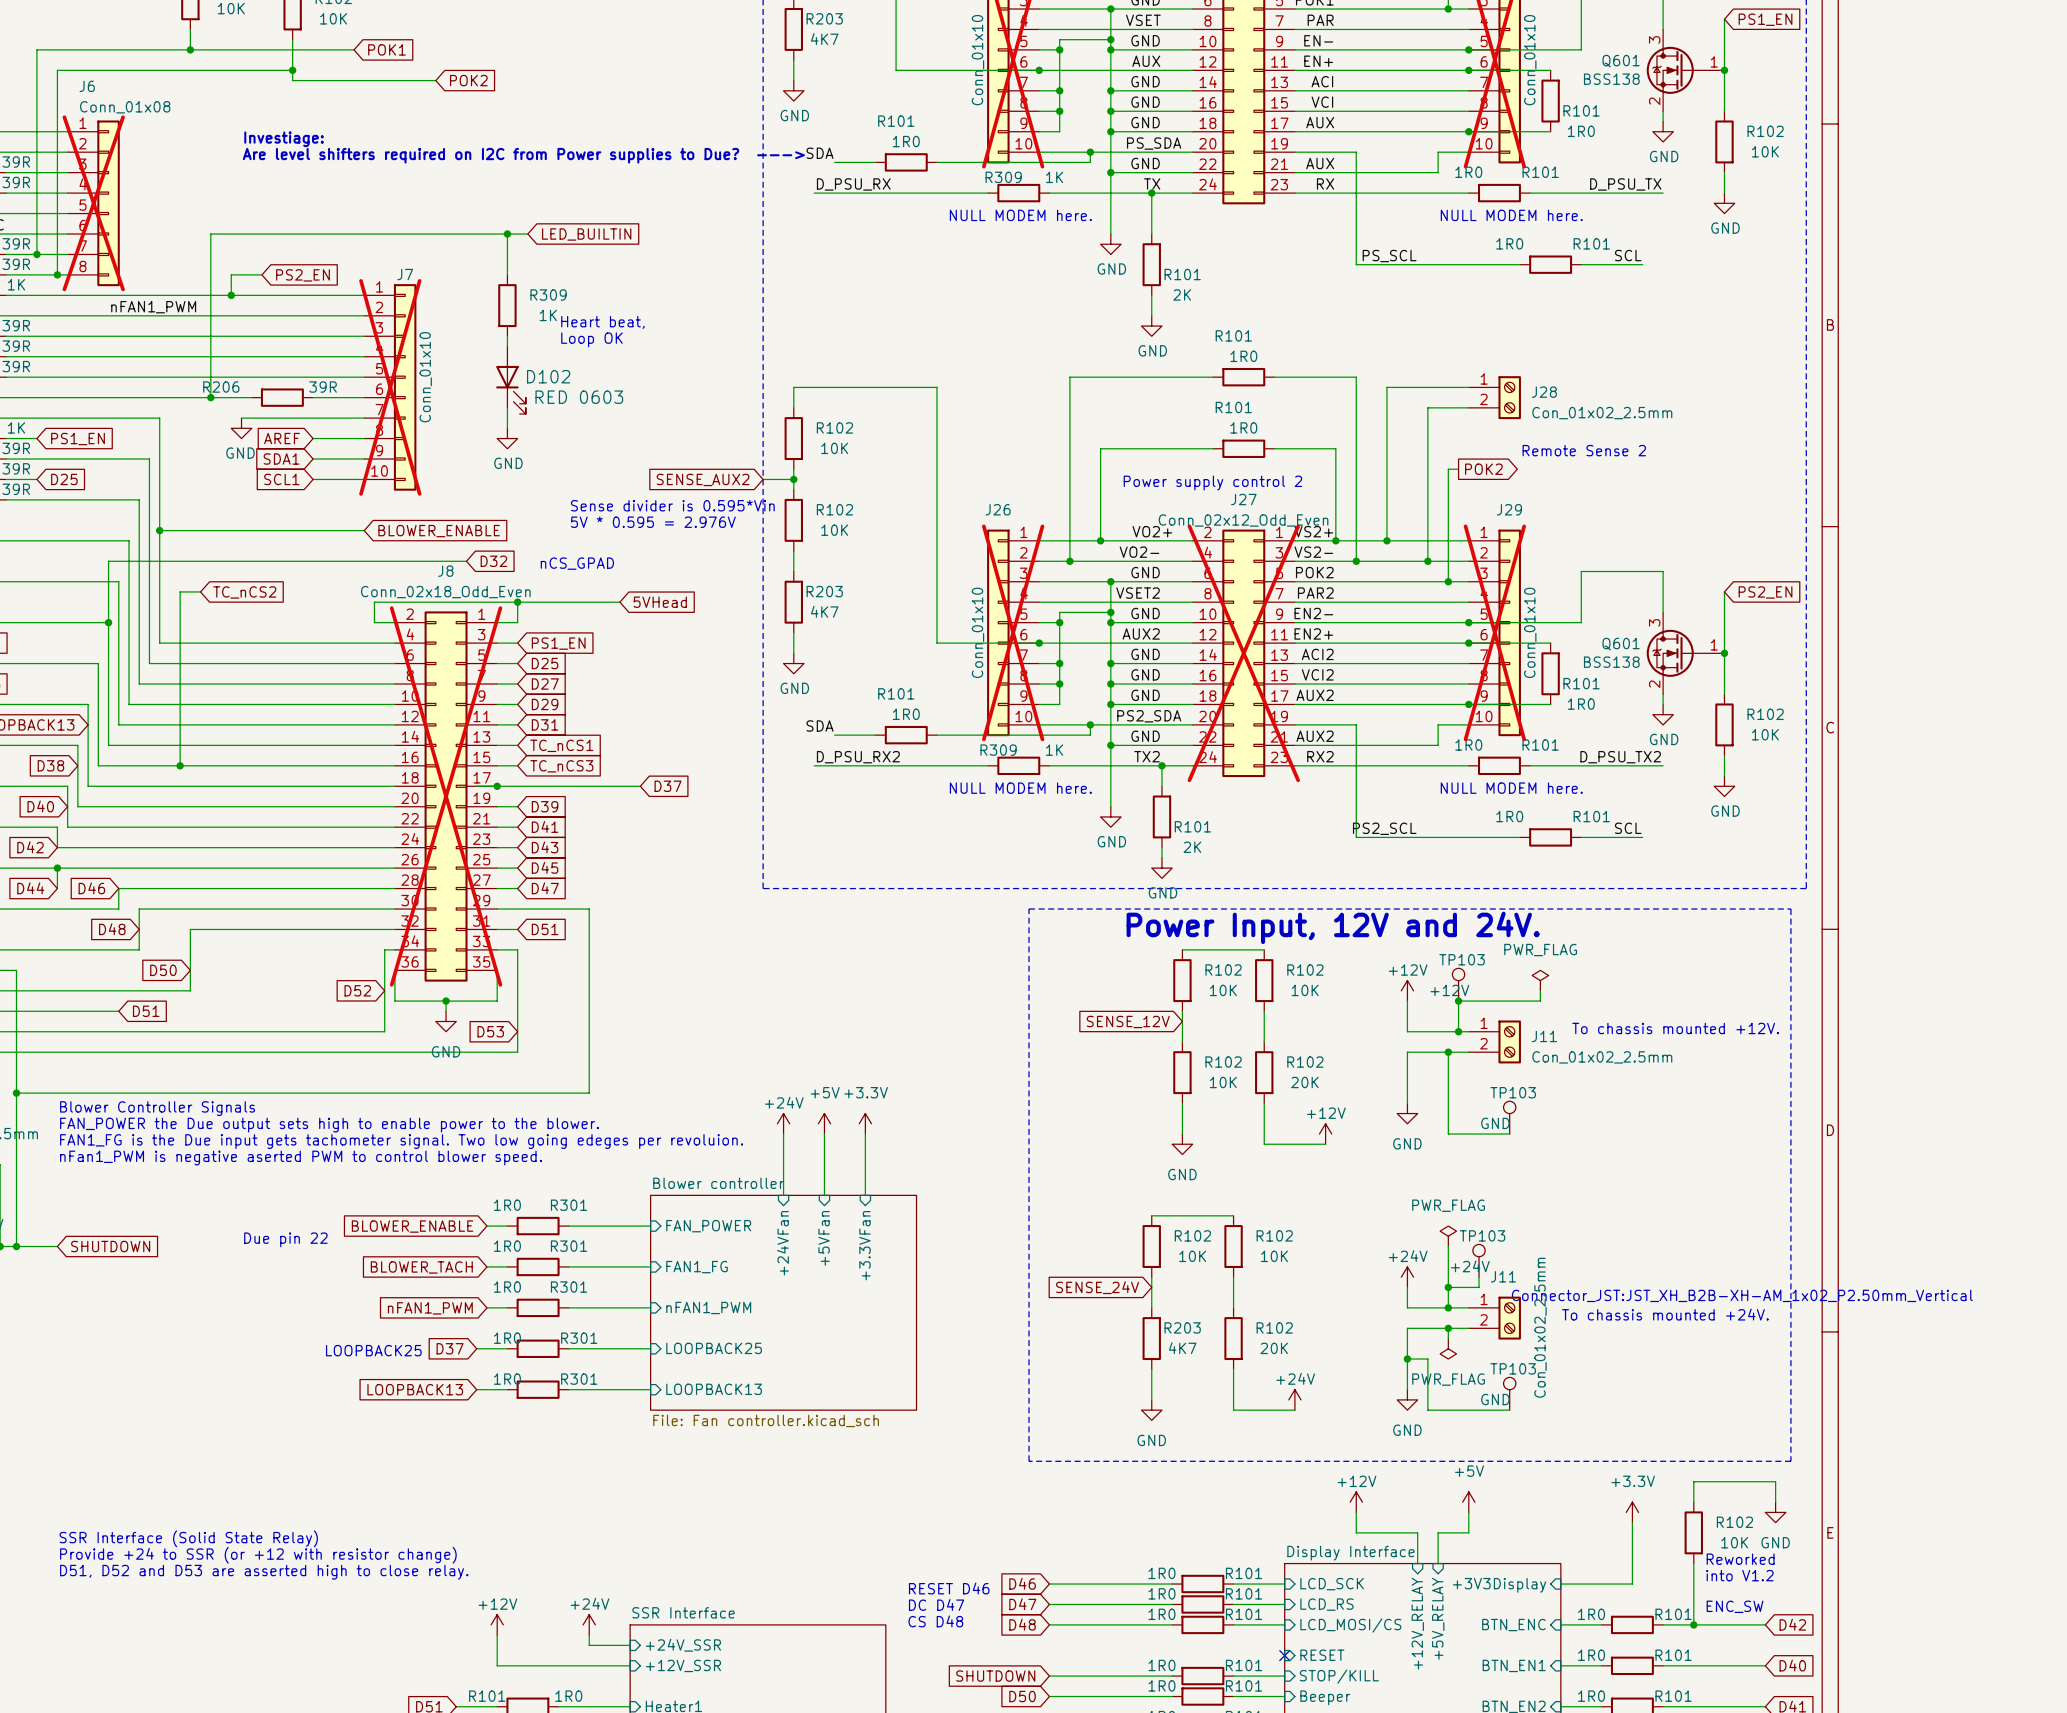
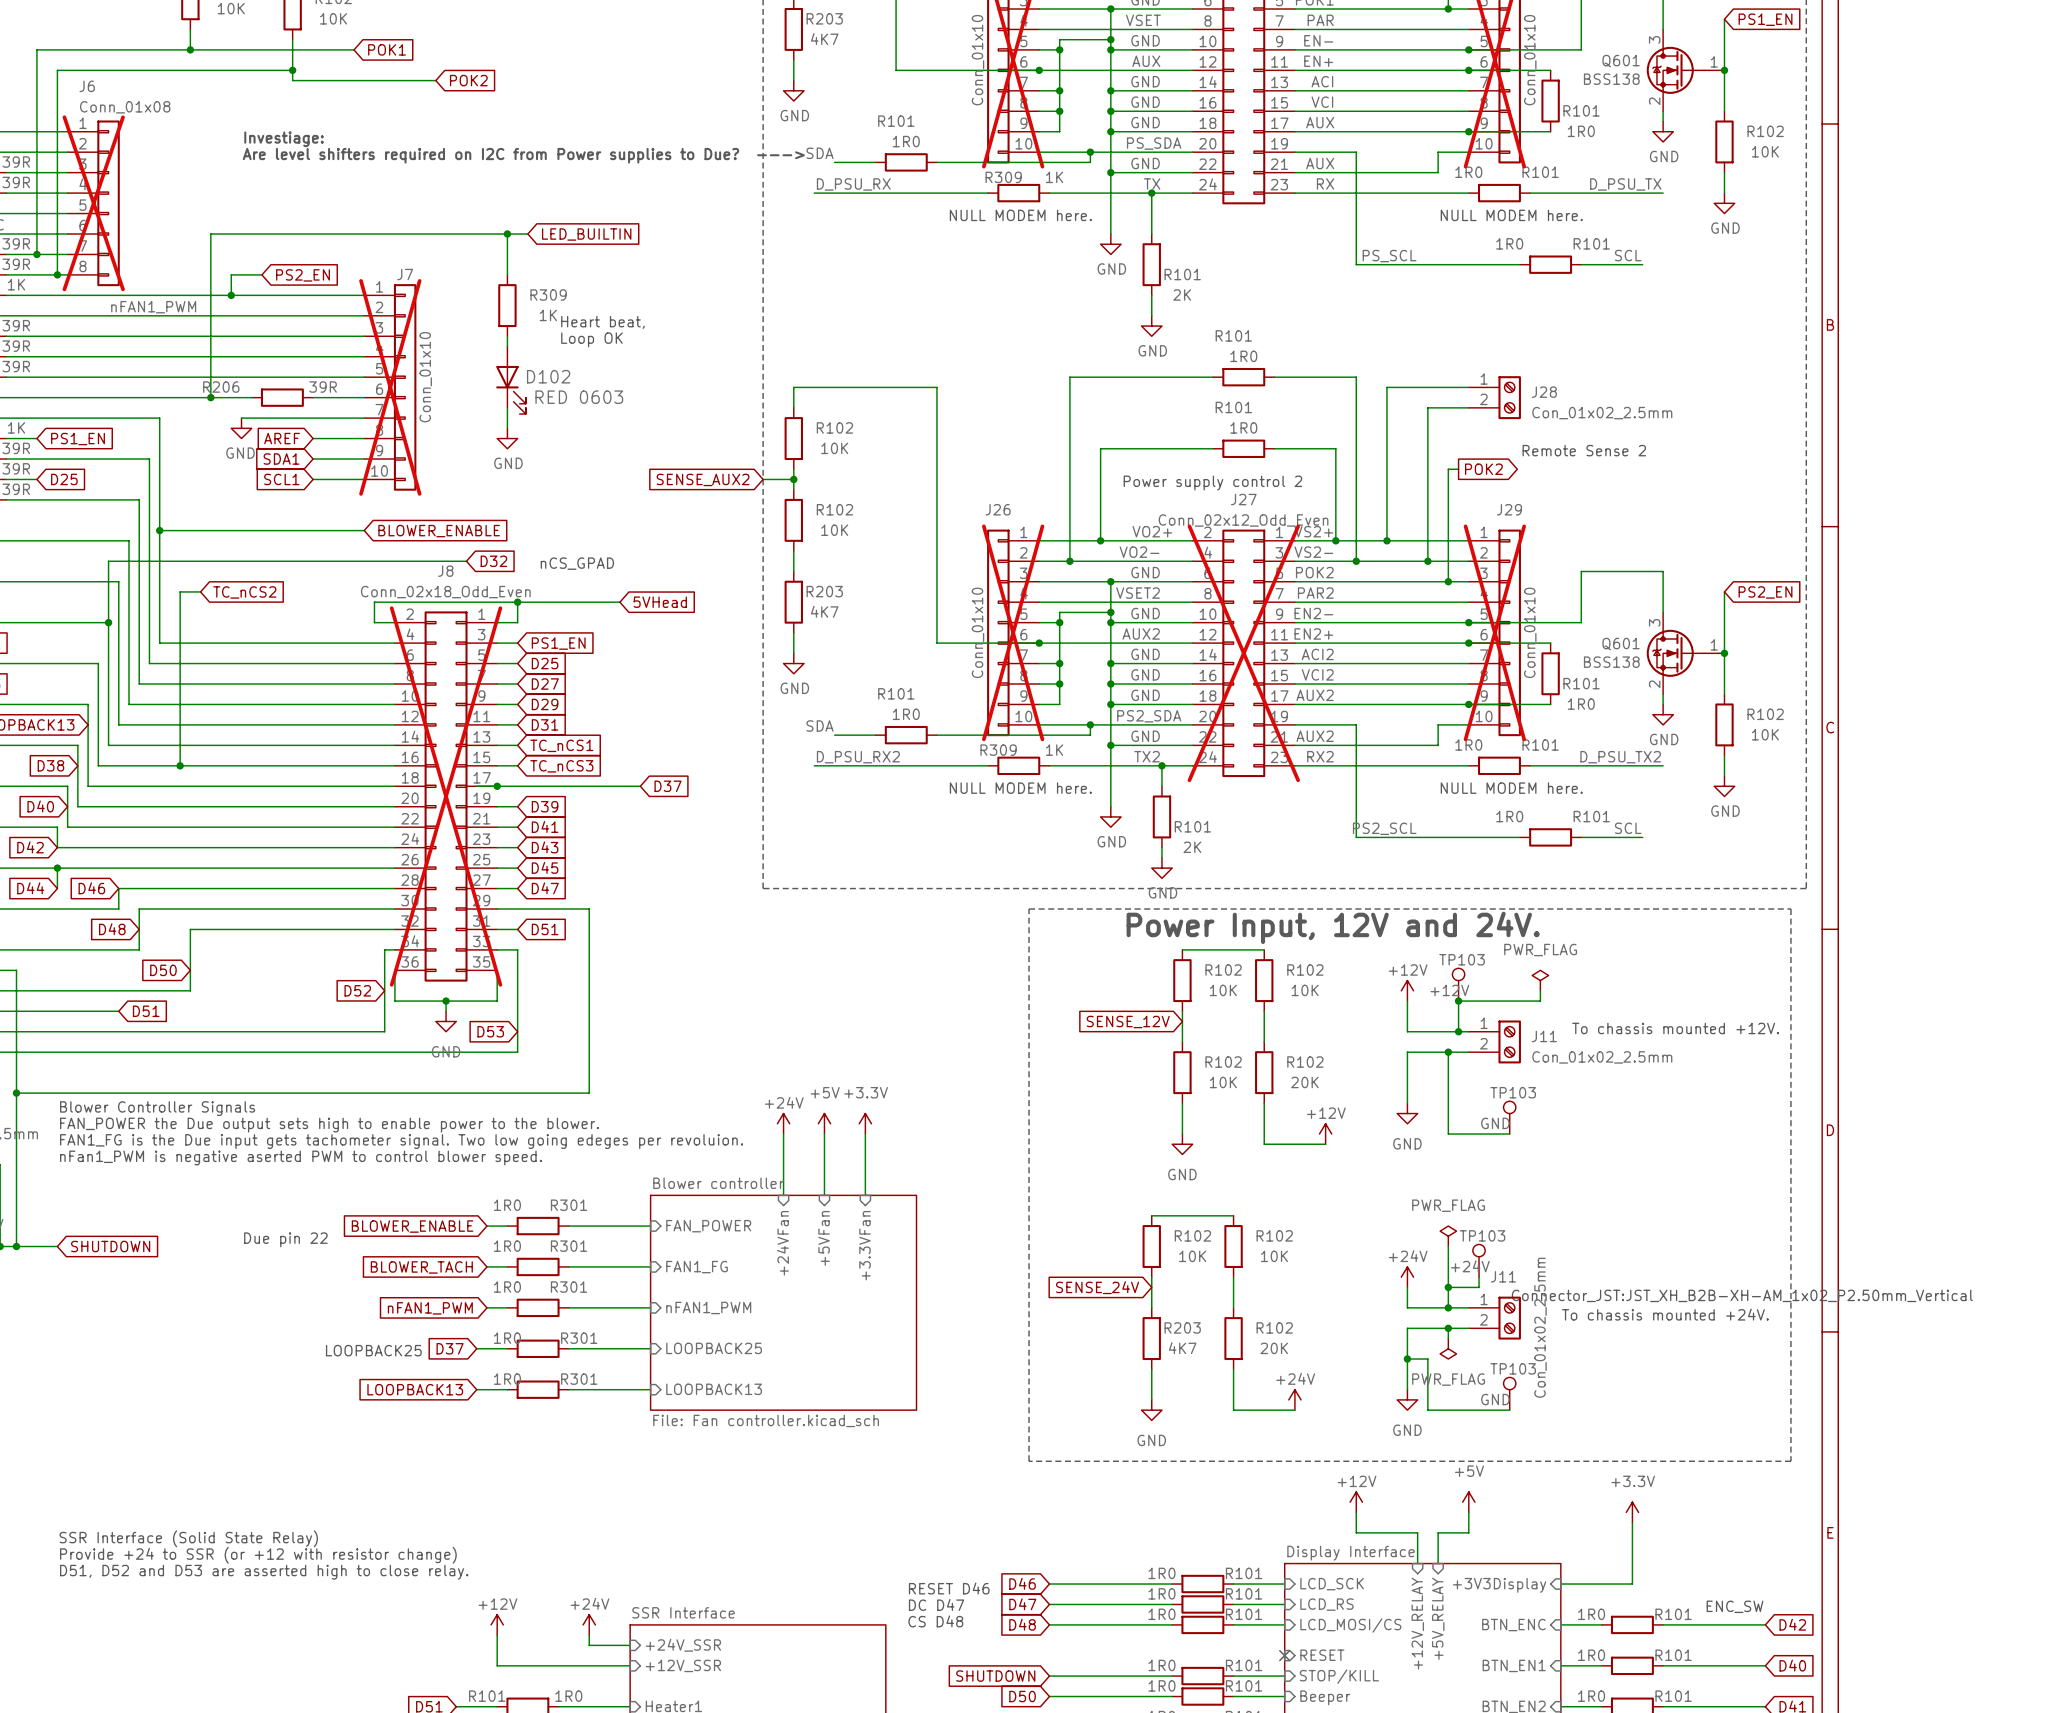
text: Sense divider is 0.595*Vin (672, 505) -> none
text: 5V * 0.595 = 2.976V (653, 522) -> none
wire: (1693, 1502) (1693, 1481) (1775, 1481) (1775, 1502) -> none
power symbol: GND (1775, 1512) -> none
R102: 10K (1693, 1532) -> none
text: Reworked (1740, 1559) -> none
wire: (1693, 1563) (1693, 1624) -> none
text: into V1.2 (1739, 1575) -> none
junction: (1693, 1624) -> none

